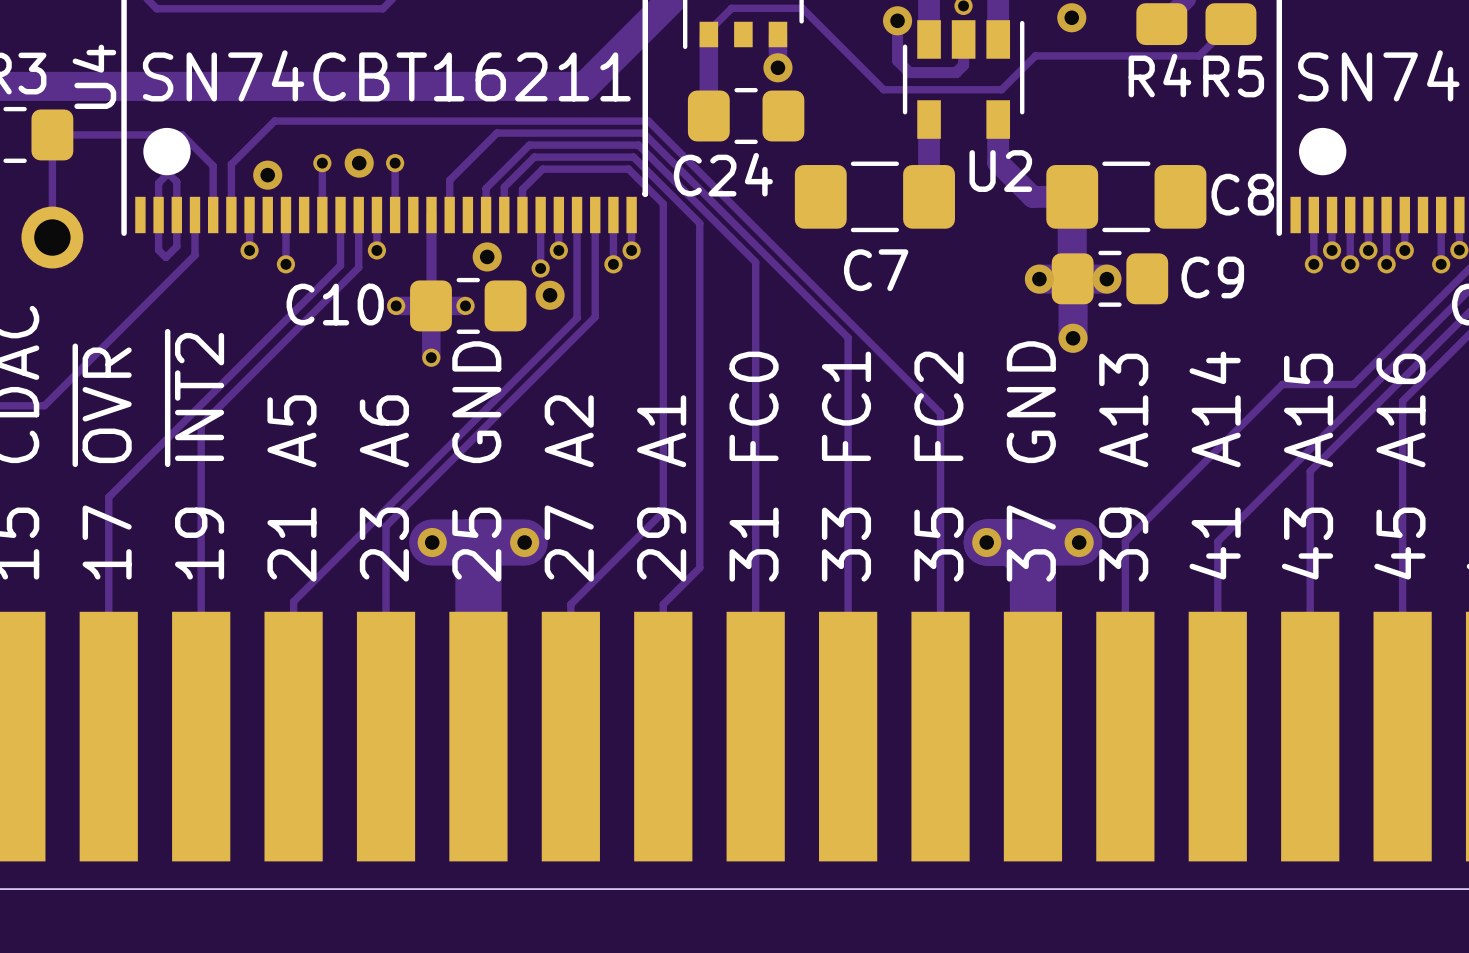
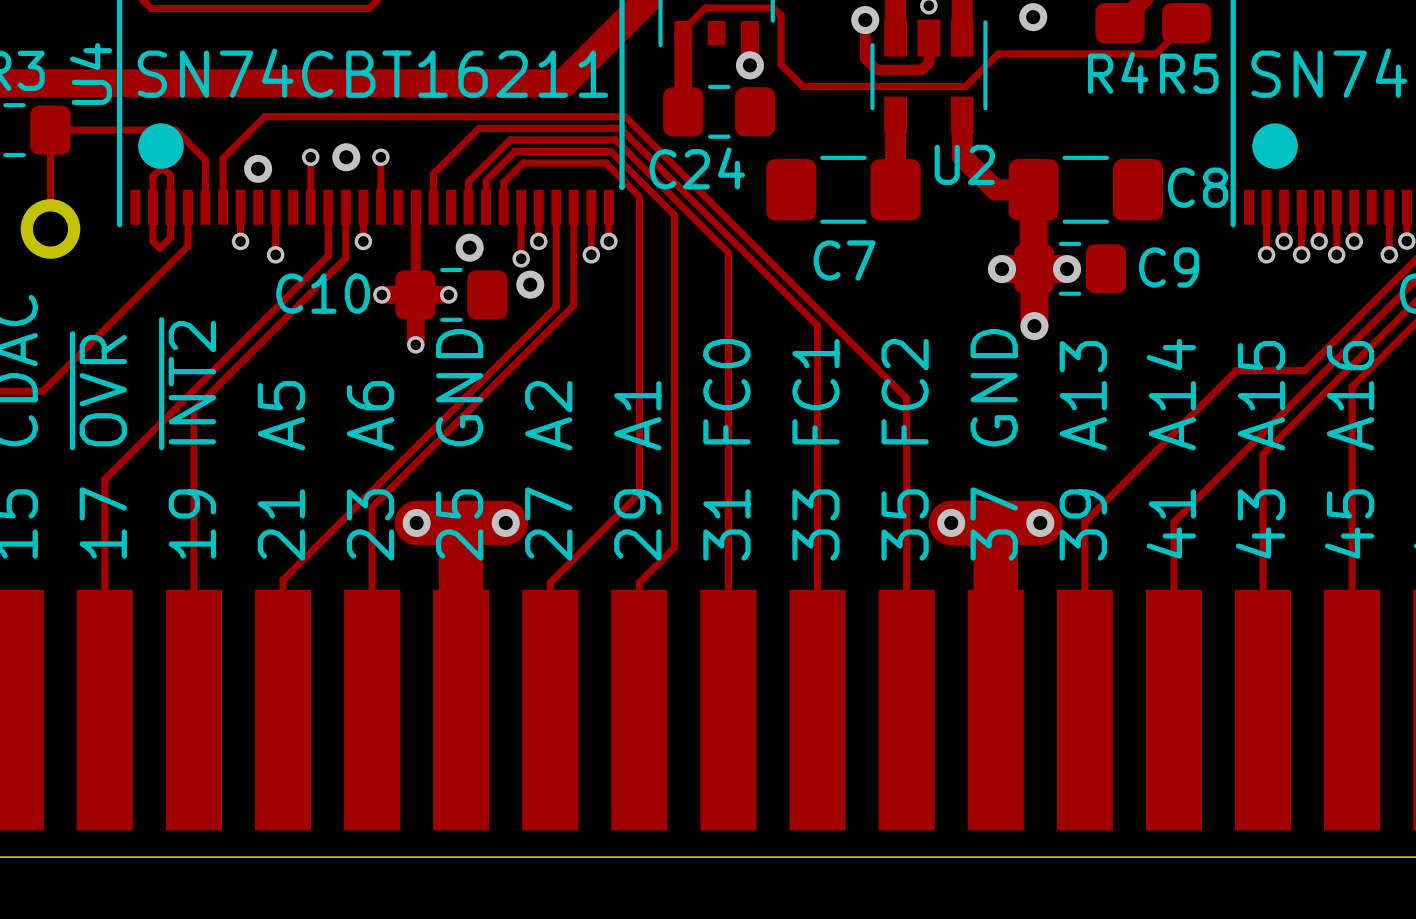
track: (810, 16) (883, 89) -> (781, 15) (781, 64) (802, 86) (851, 86)

